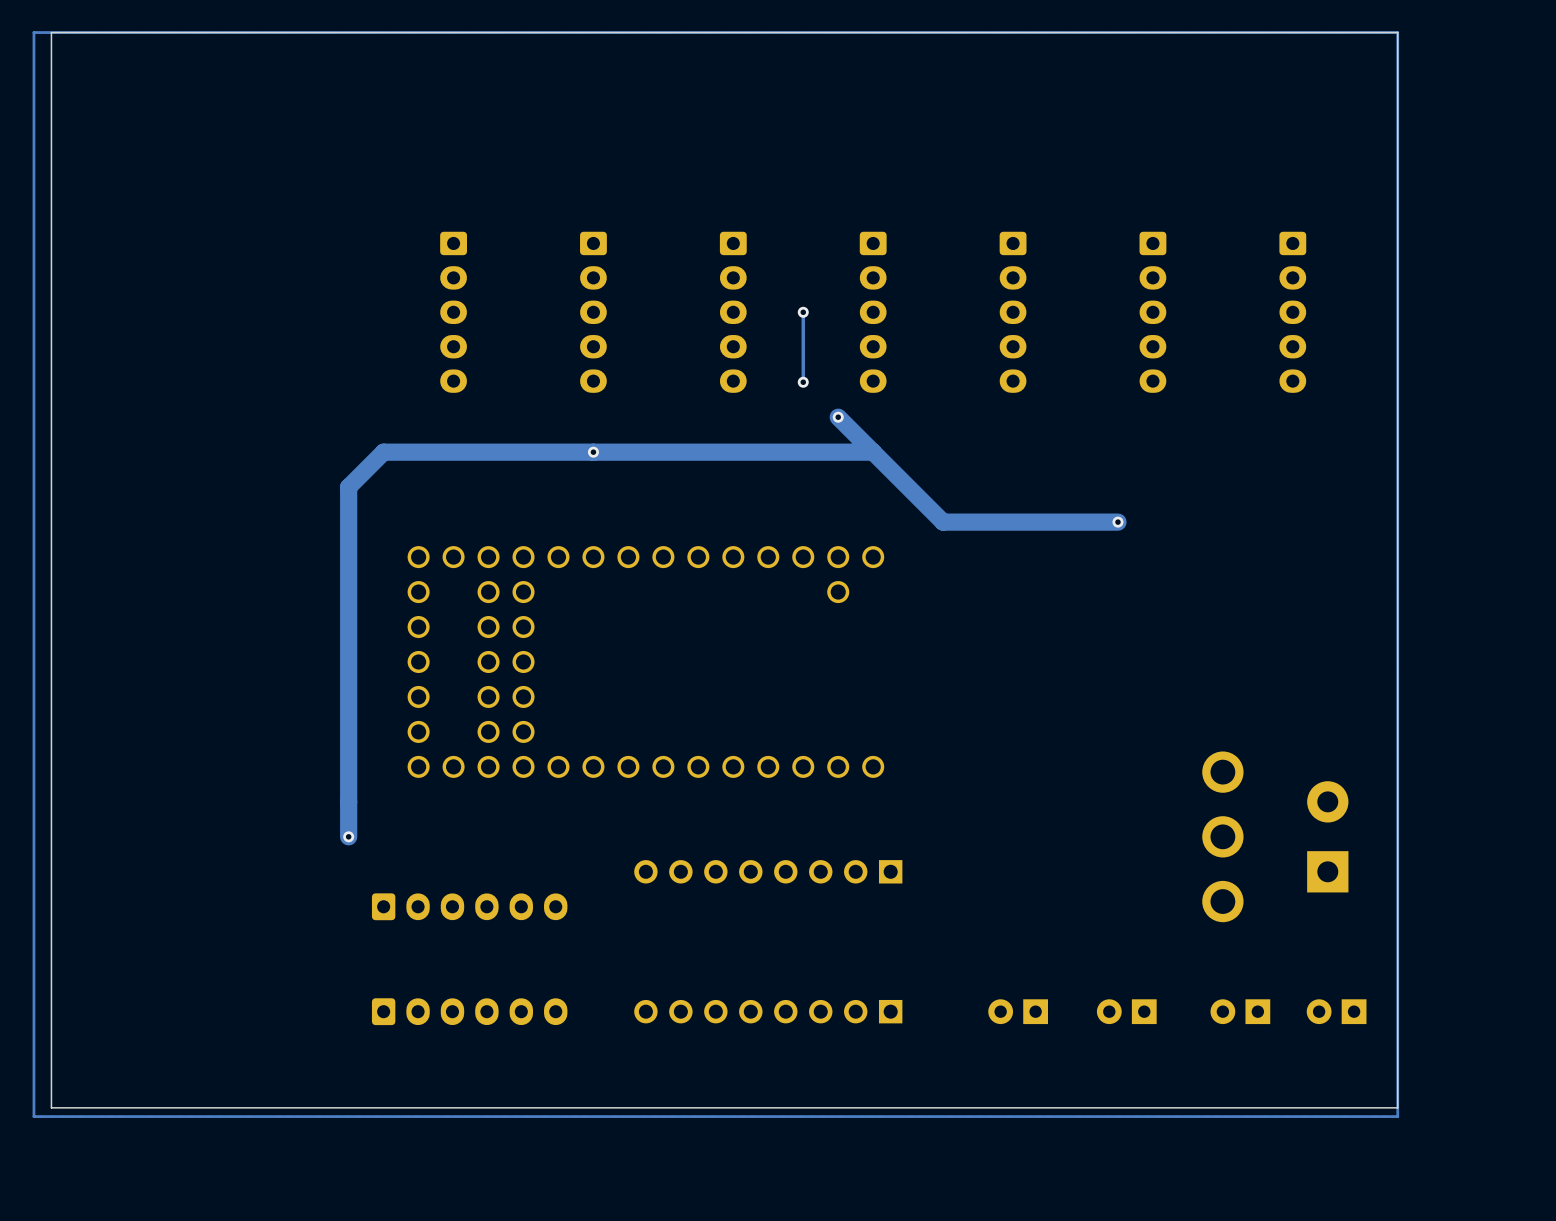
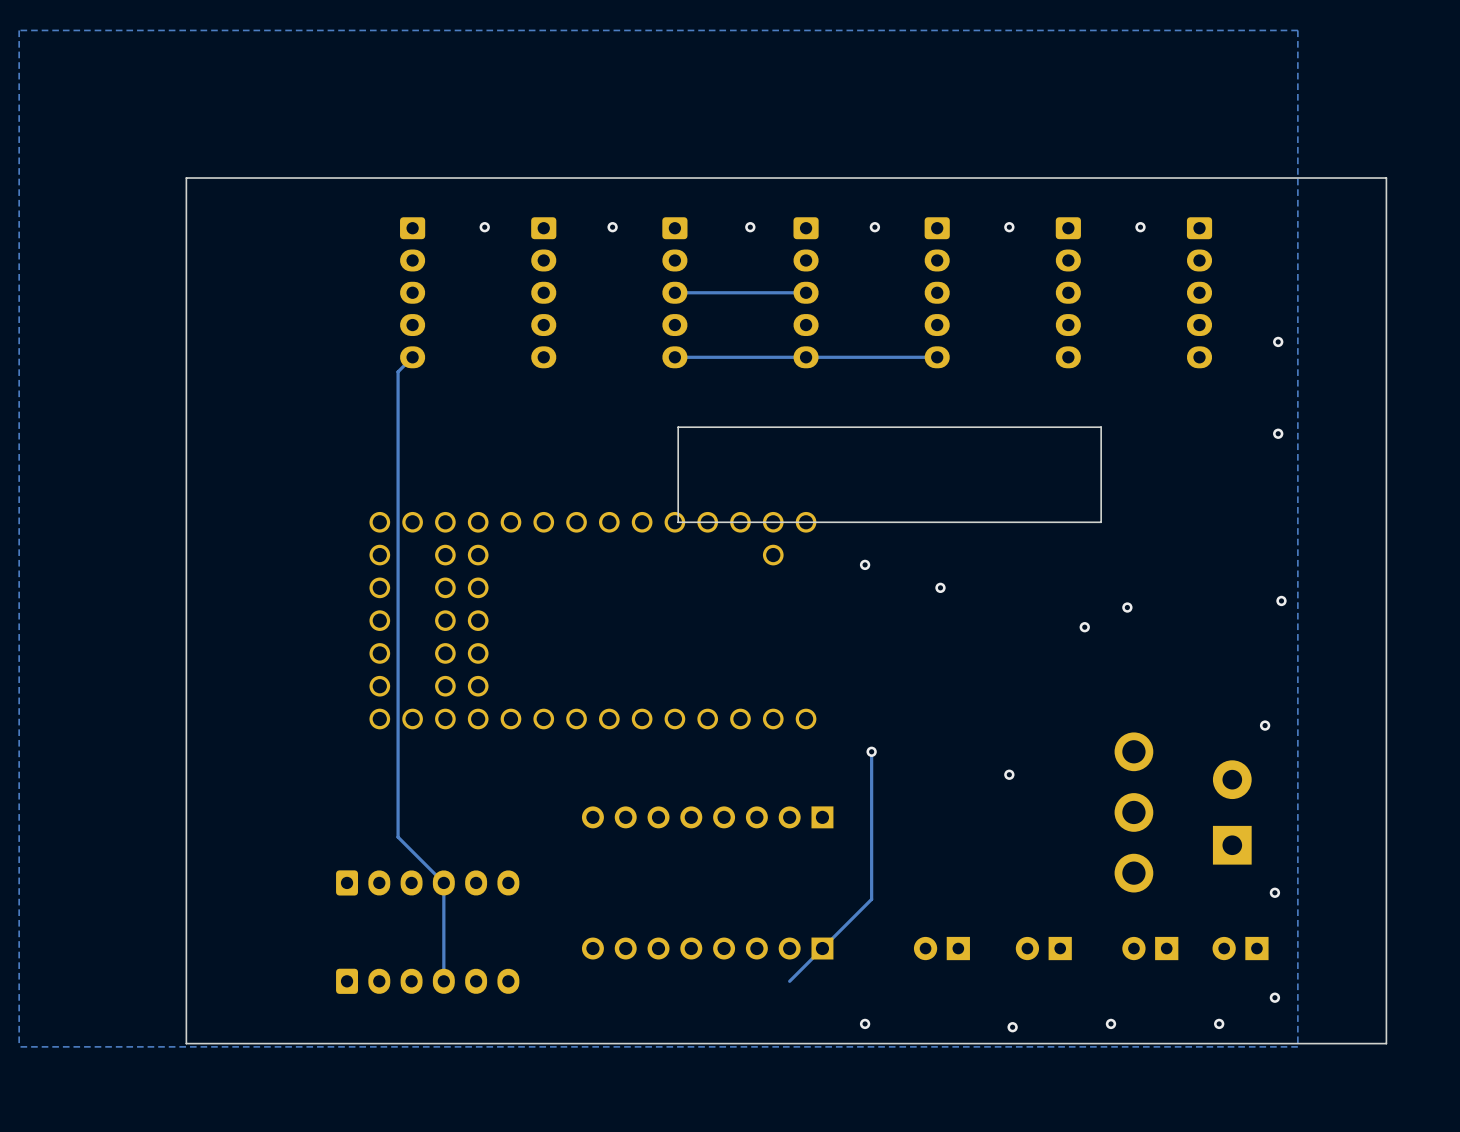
track: (1397, 32) (33, 32) (33, 1116) (1397, 1116) (1397, 32) -> none
board edge: (1397, 32) (51, 32) (51, 1107) (1397, 1107) (1397, 32) -> (1386, 178) (1386, 1043) (186, 1043) (186, 178) (1386, 178)
via: none -> (484, 227)
via: none -> (612, 227)
via: none -> (750, 227)
via: none -> (874, 227)
via: none -> (1009, 227)
via: none -> (1140, 227)
track: (803, 312) (803, 382) -> none
via: (803, 312) -> none
track: none -> (806, 292) (674, 292)
via: none -> (1278, 341)
track: none -> (412, 357) (398, 371) (398, 837) (443, 882) (443, 981)
track: none -> (937, 357) (674, 357)
via: (803, 382) -> none
track: (838, 417) (943, 522) (1117, 522) -> none
via: (838, 417) -> none
via: (593, 452) -> none
track: (873, 452) (383, 452) (348, 487) (348, 836) -> none
board edge: none -> (1101, 427) (678, 427) (678, 522) (1101, 522) (1101, 427)
via: none -> (1278, 433)
via: (1117, 522) -> none
via: none -> (865, 564)
via: none -> (940, 587)
via: none -> (1281, 600)
via: none -> (1127, 607)
via: none -> (1084, 627)
via: none -> (1265, 725)
track: none -> (871, 751) (871, 899) (789, 981)
via: none -> (871, 751)
via: none -> (1009, 774)
via: (348, 836) -> none
part position: (1222, 836) -> (1133, 812)
part position: (1327, 836) -> (1232, 812)
part: (469, 906) -> none
part: none -> (427, 882)
via: none -> (1274, 892)
part: (469, 1011) -> none
part: none -> (427, 981)
via: none -> (1274, 997)
via: none -> (865, 1023)
via: none -> (1110, 1023)
via: none -> (1219, 1023)
via: none -> (1012, 1027)

